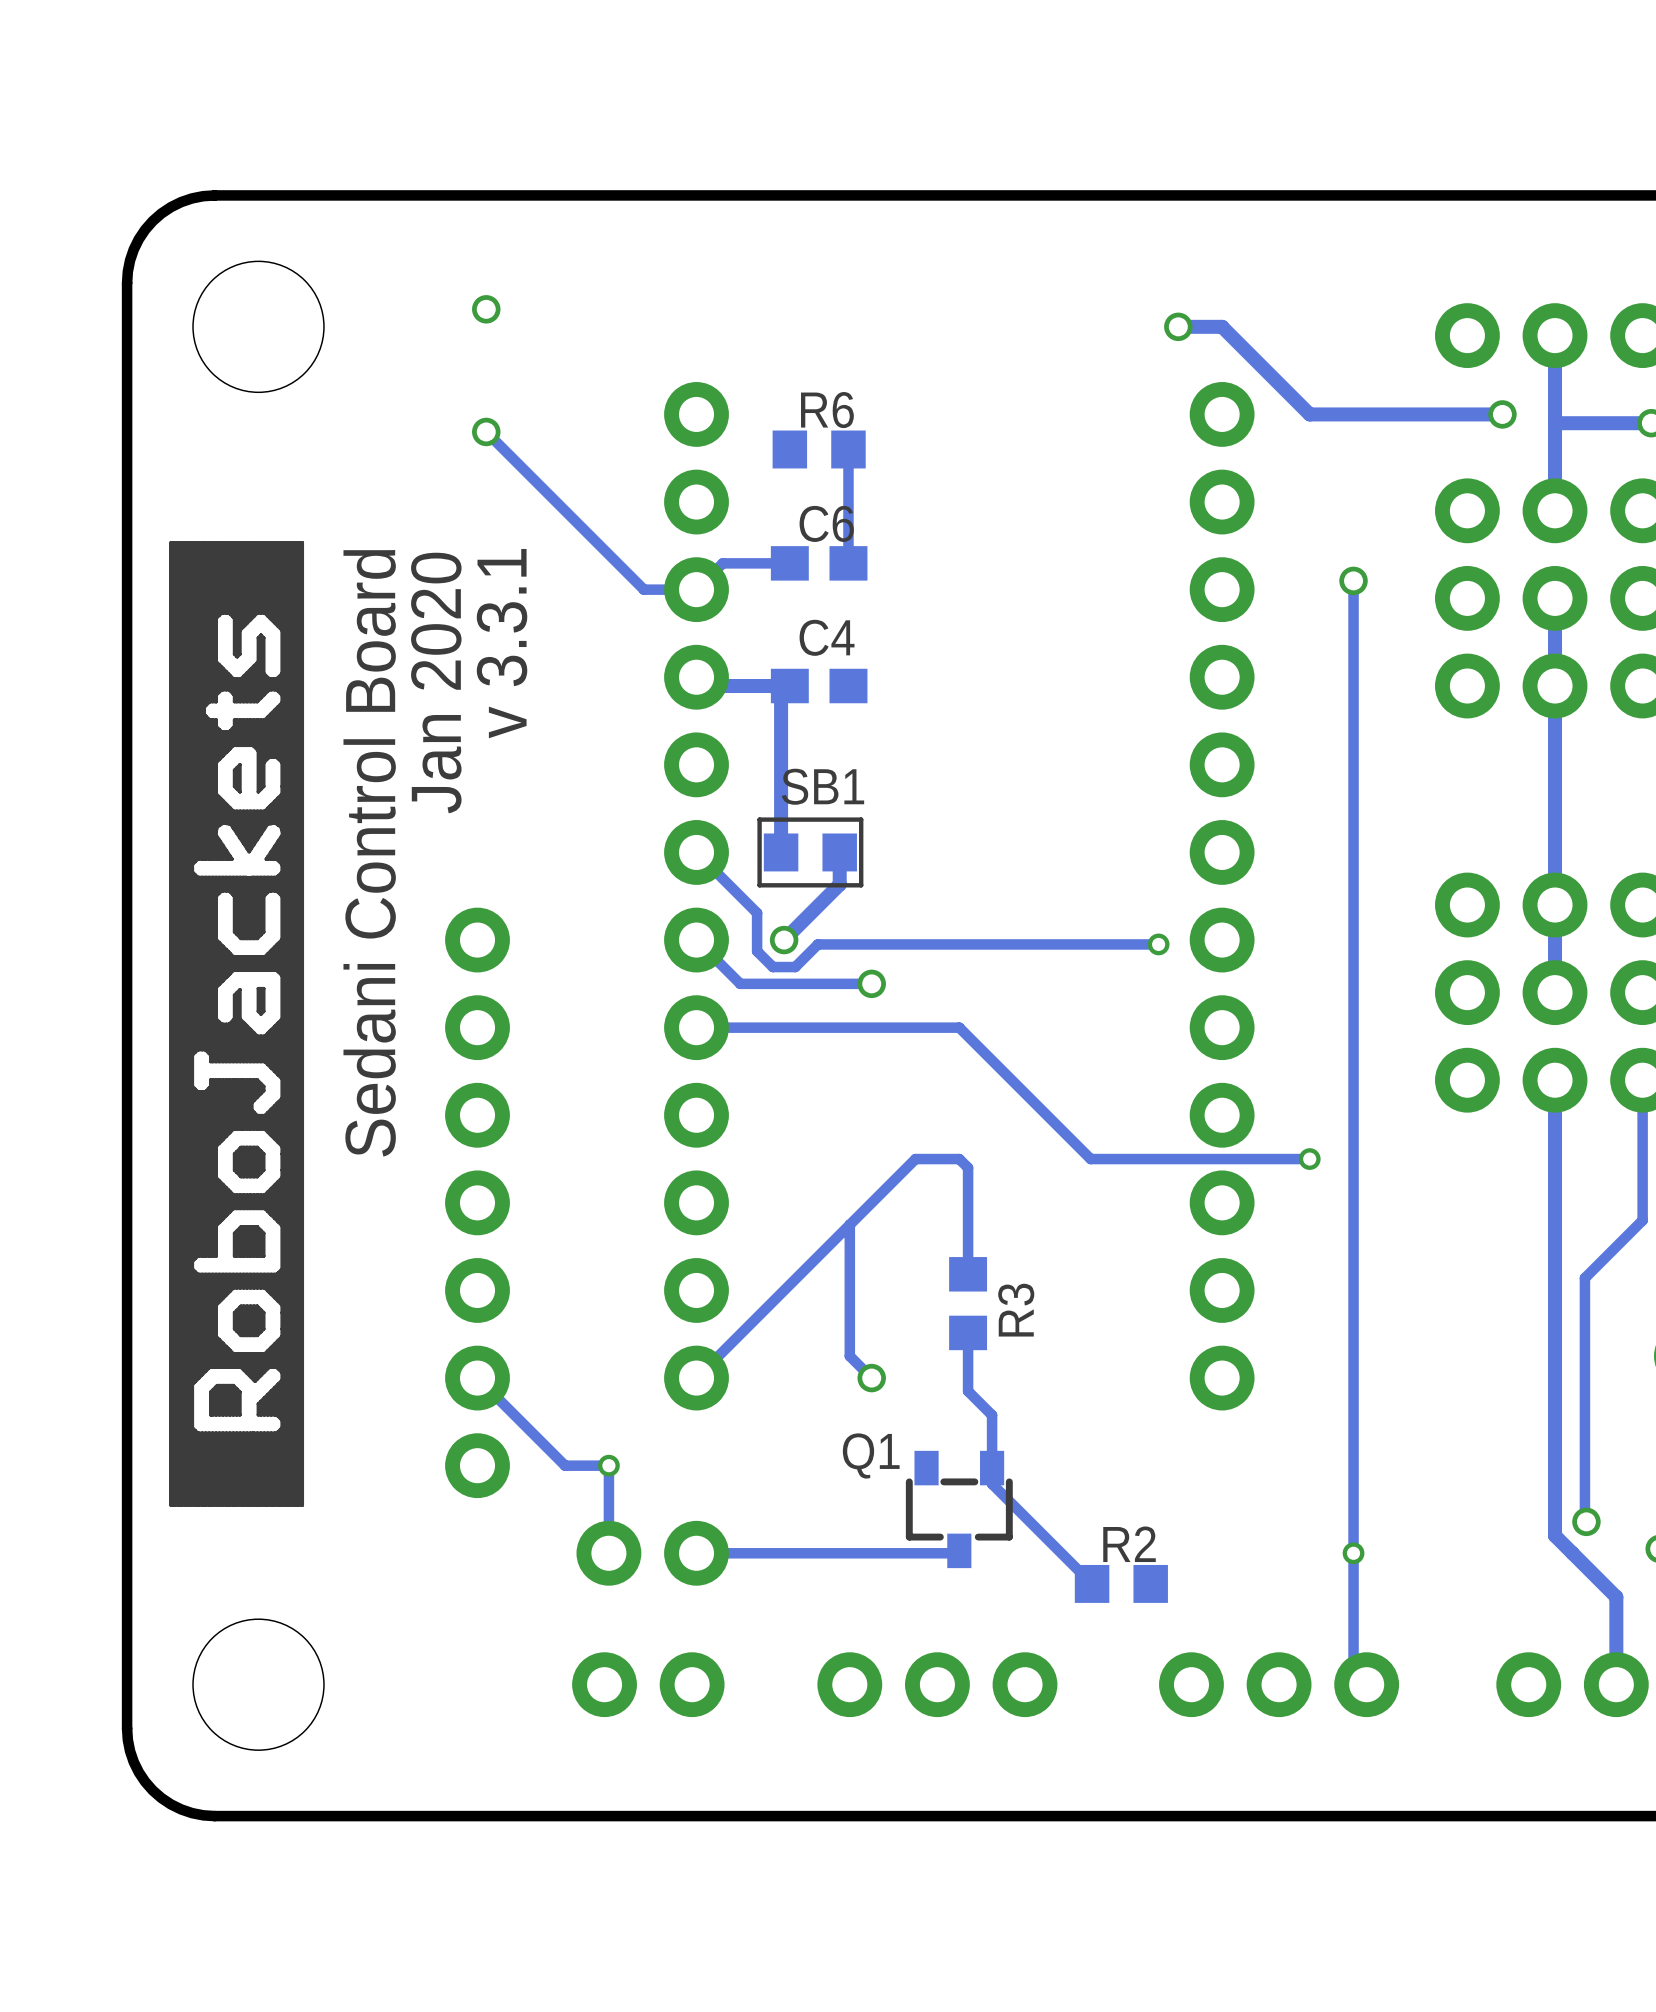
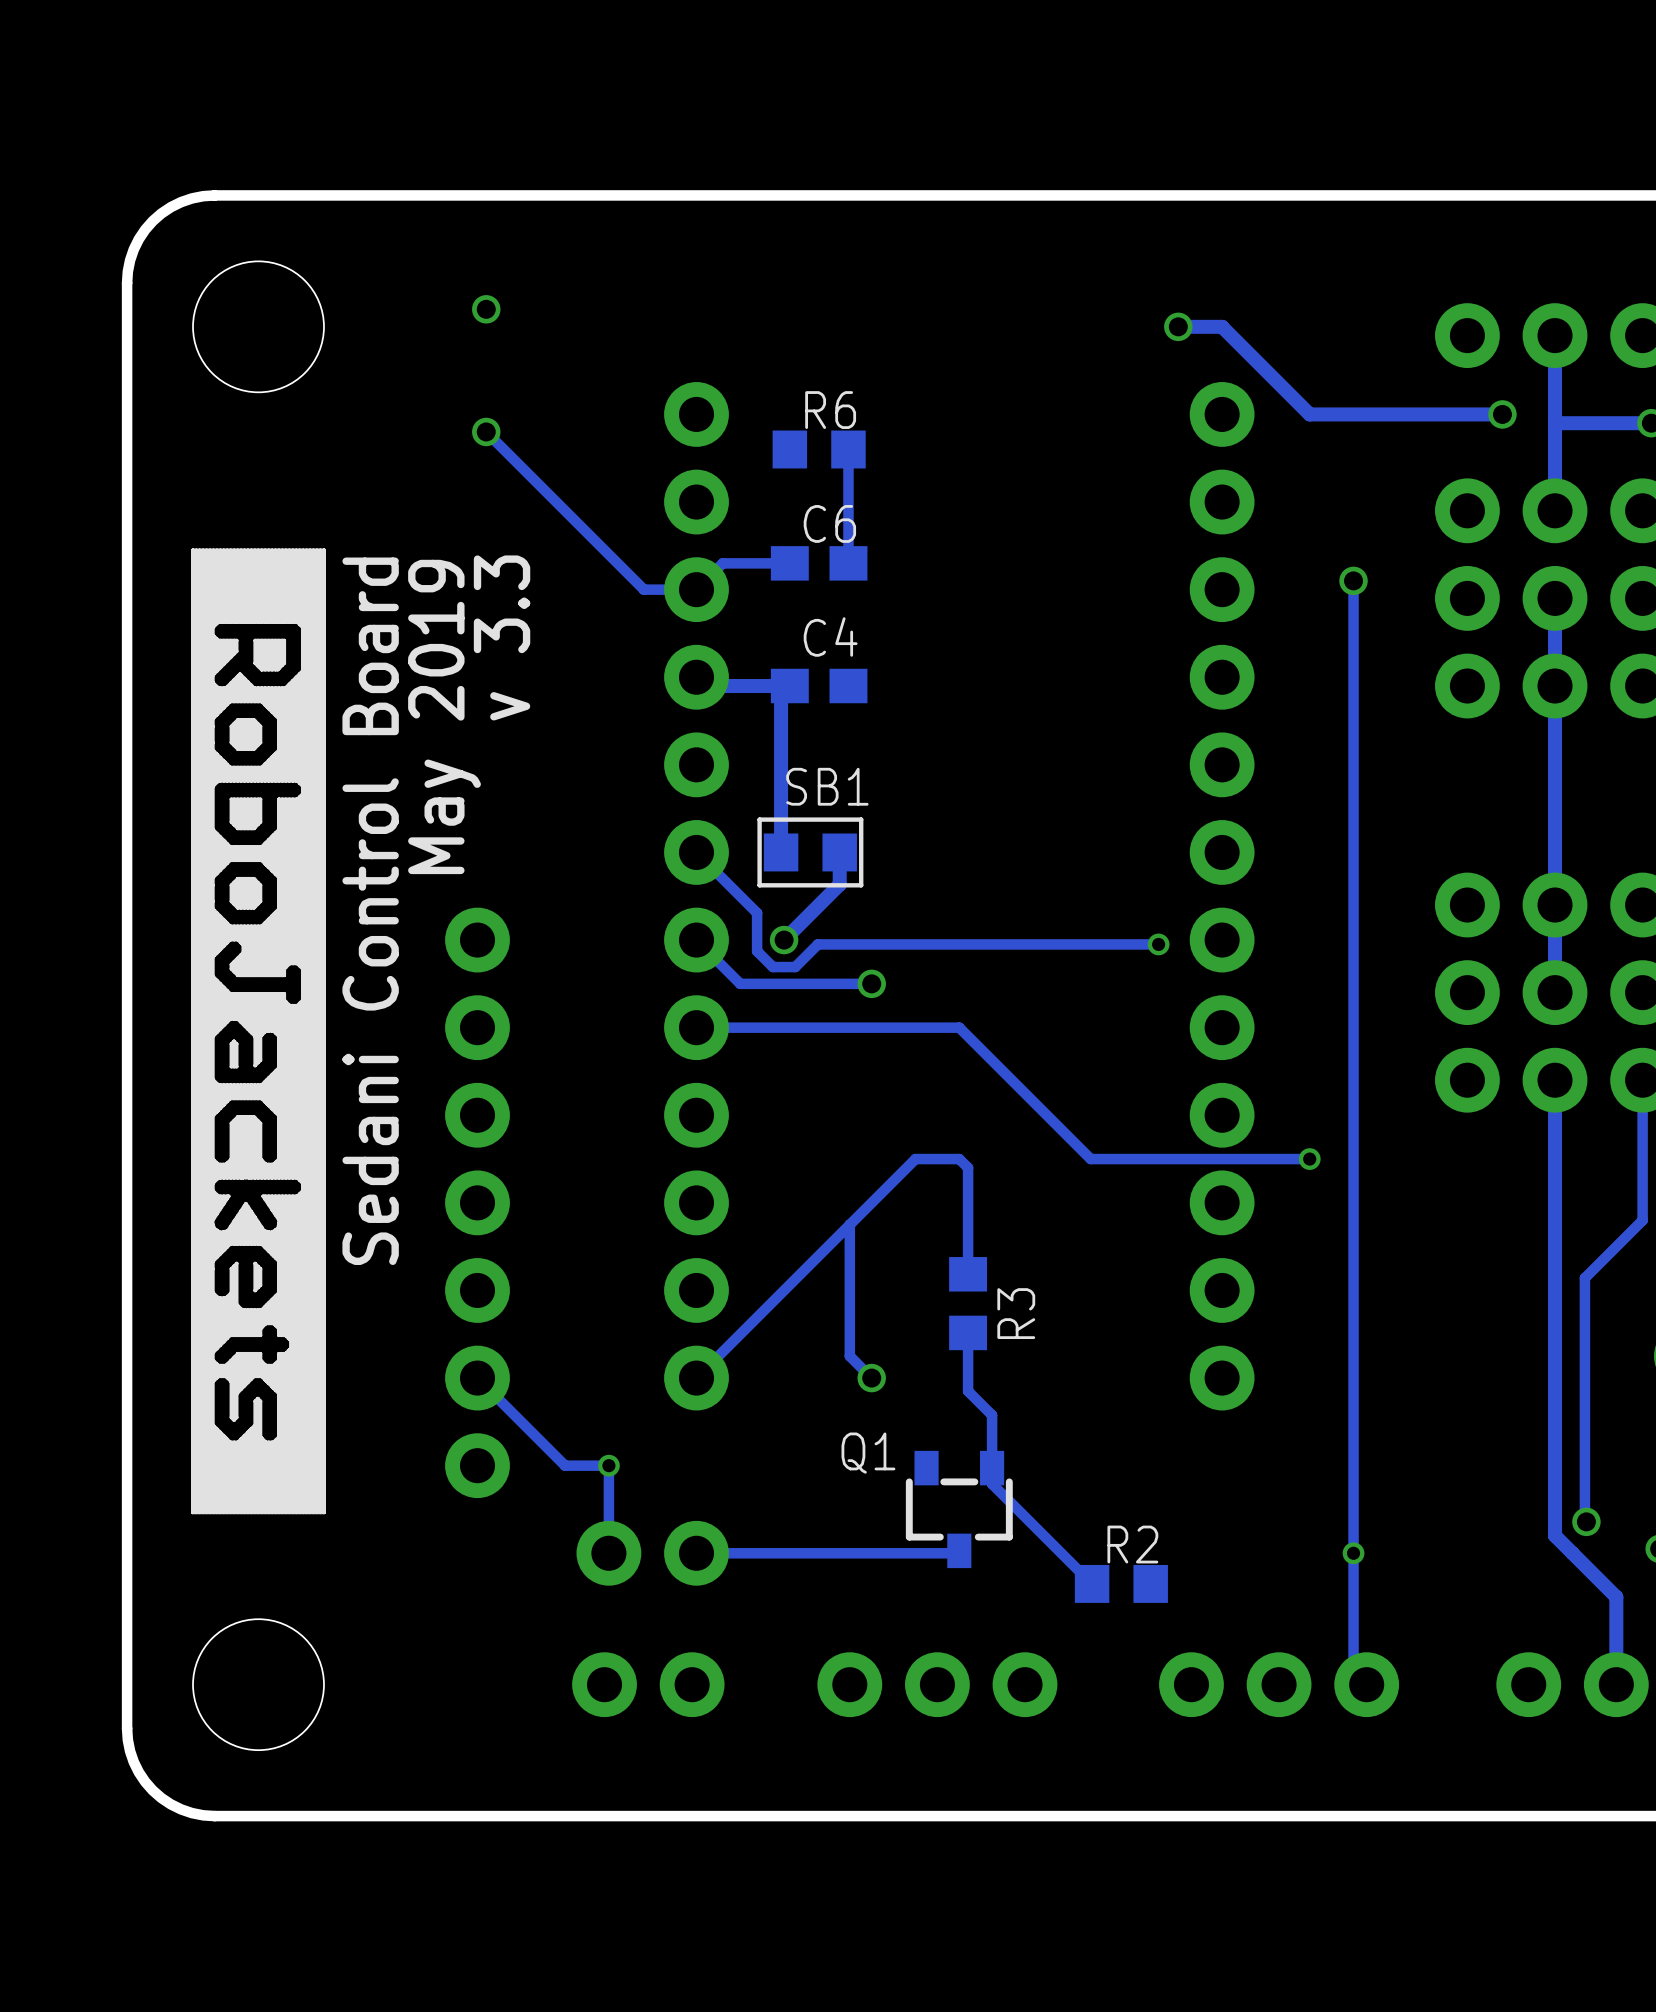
drawing shape: [169, 541, 305, 1507] -> [191, 548, 326, 1515]
text: v 3.3.1 (502, 643) -> v 3.3 (502, 637)
text: Jan 2020 (436, 683) -> May 2019 (444, 716)

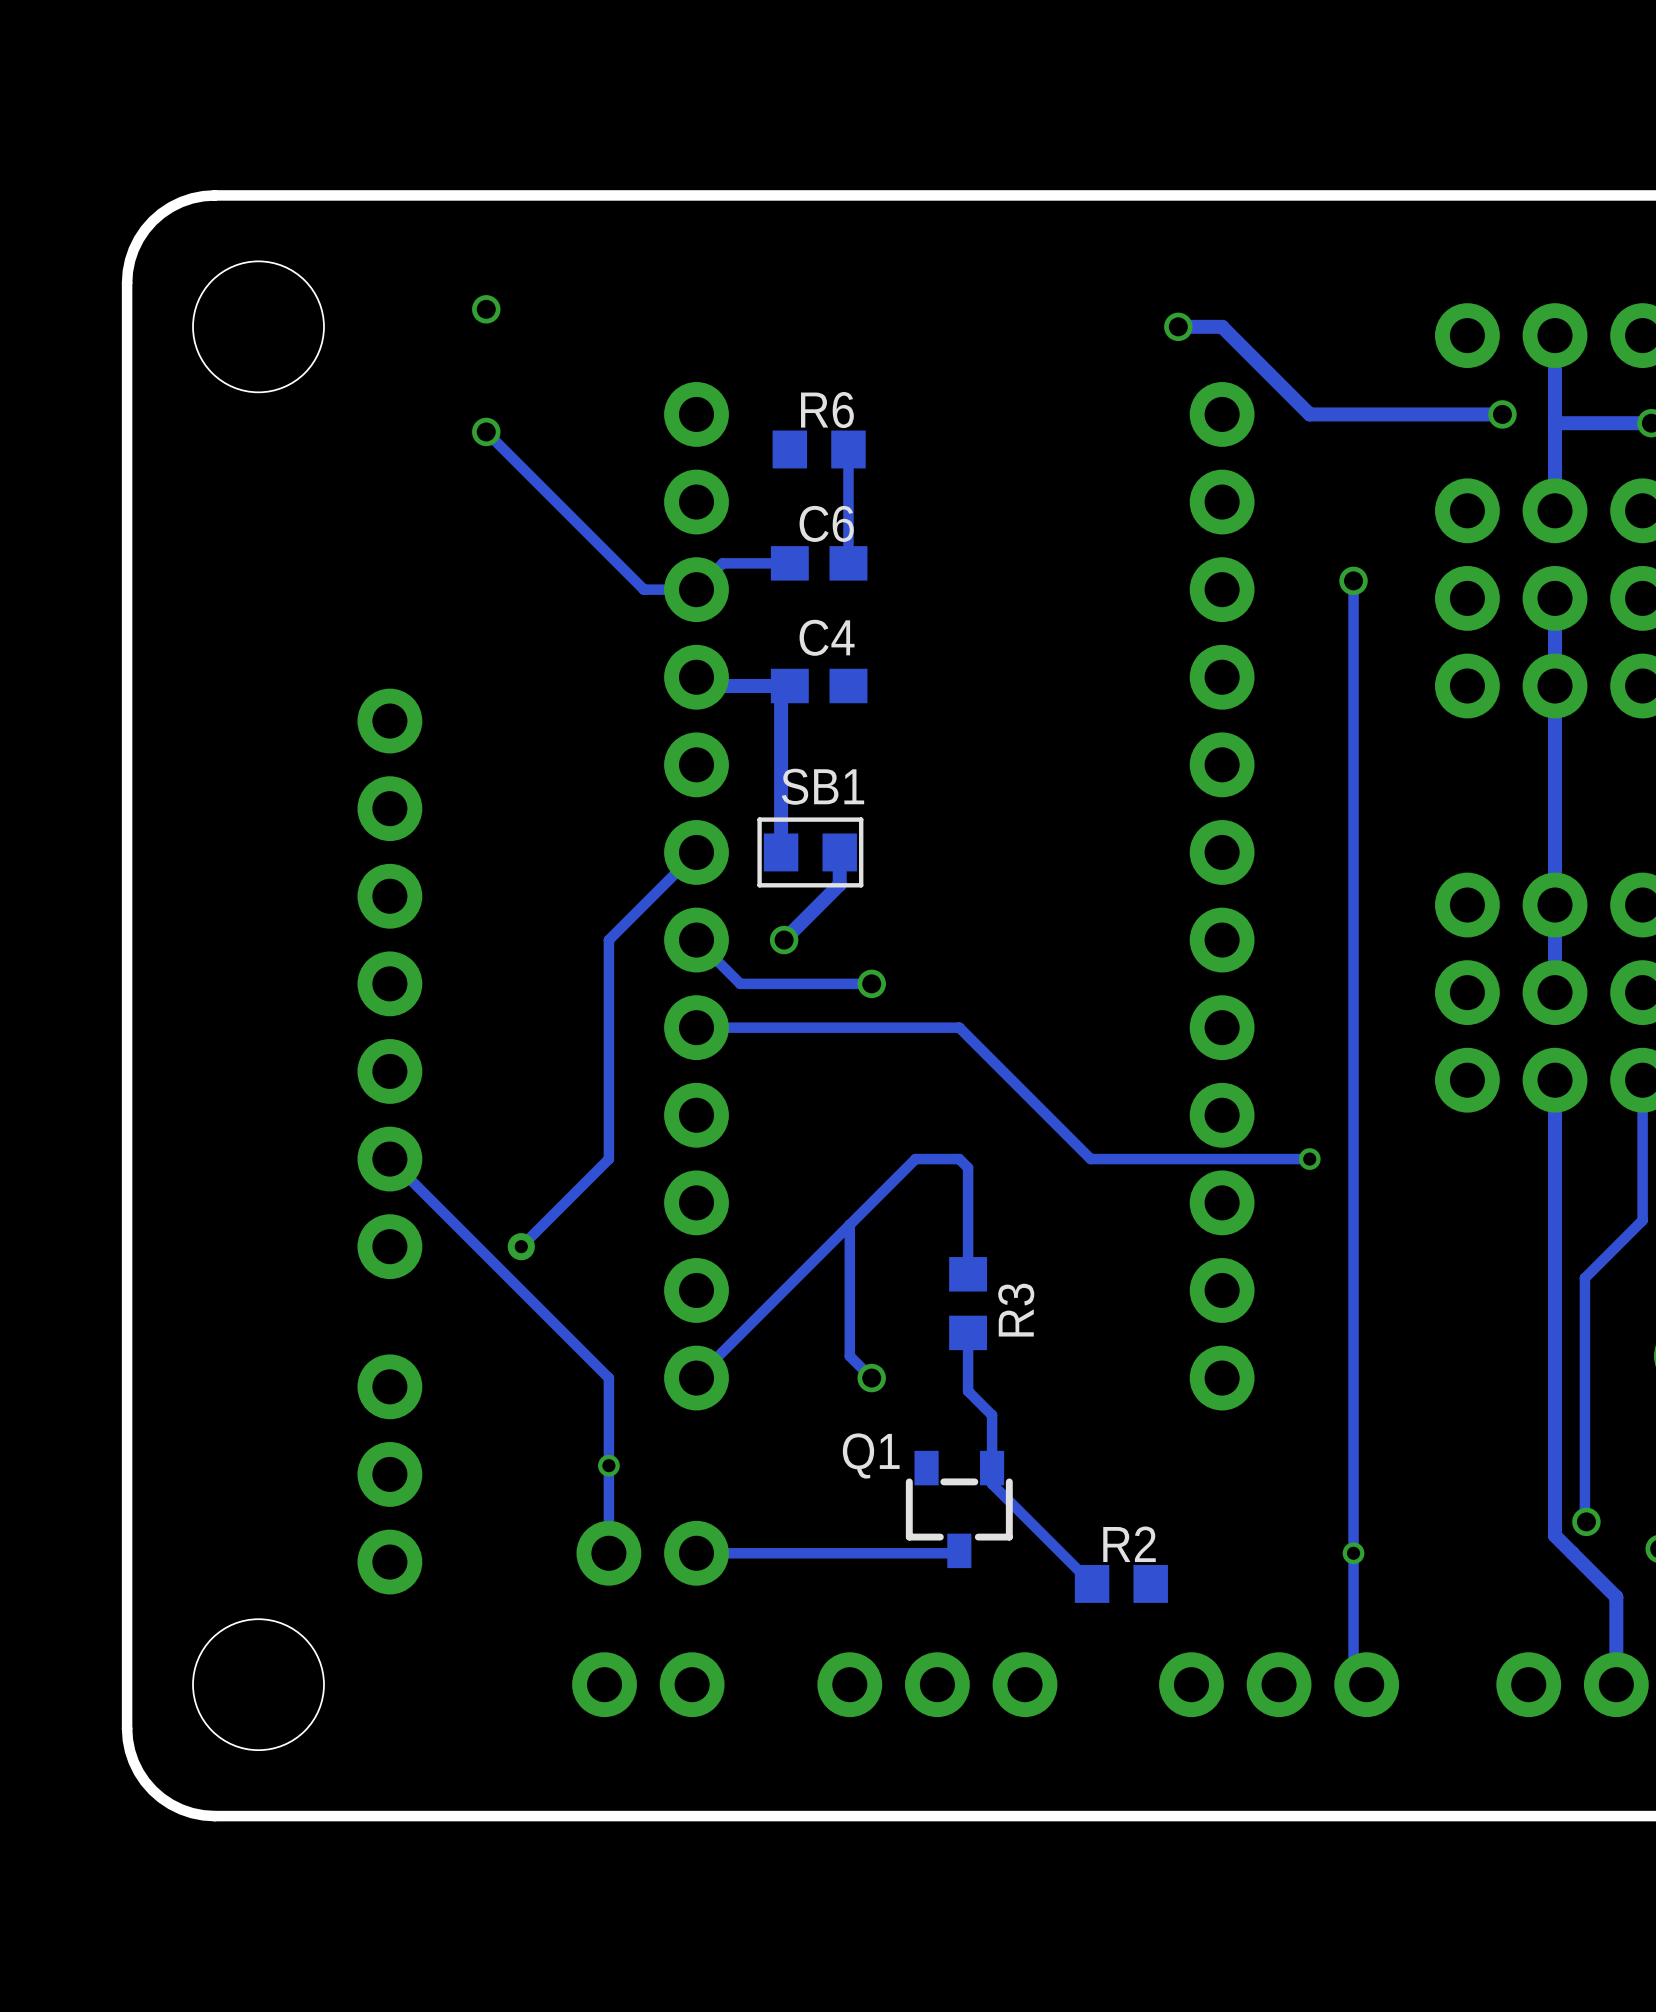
drawing: [191, 548, 326, 1515] -> none
text: v 3.3 (502, 637) -> none
text: May 2019 (444, 716) -> none
track: (696, 852) (757, 913) (757, 951) (772, 967) (795, 967) (817, 944) (1158, 944) -> (696, 852) (608, 940) (608, 1159) (521, 1246)
text: Sedani Control Board (370, 911) -> none
via: (1158, 944) -> none
part position: (477, 1202) -> (389, 983)
via: none -> (521, 1246)
track: (477, 1378) (565, 1465) (608, 1465) -> (389, 1159) (608, 1378) (608, 1465)
part: none -> (389, 1474)

